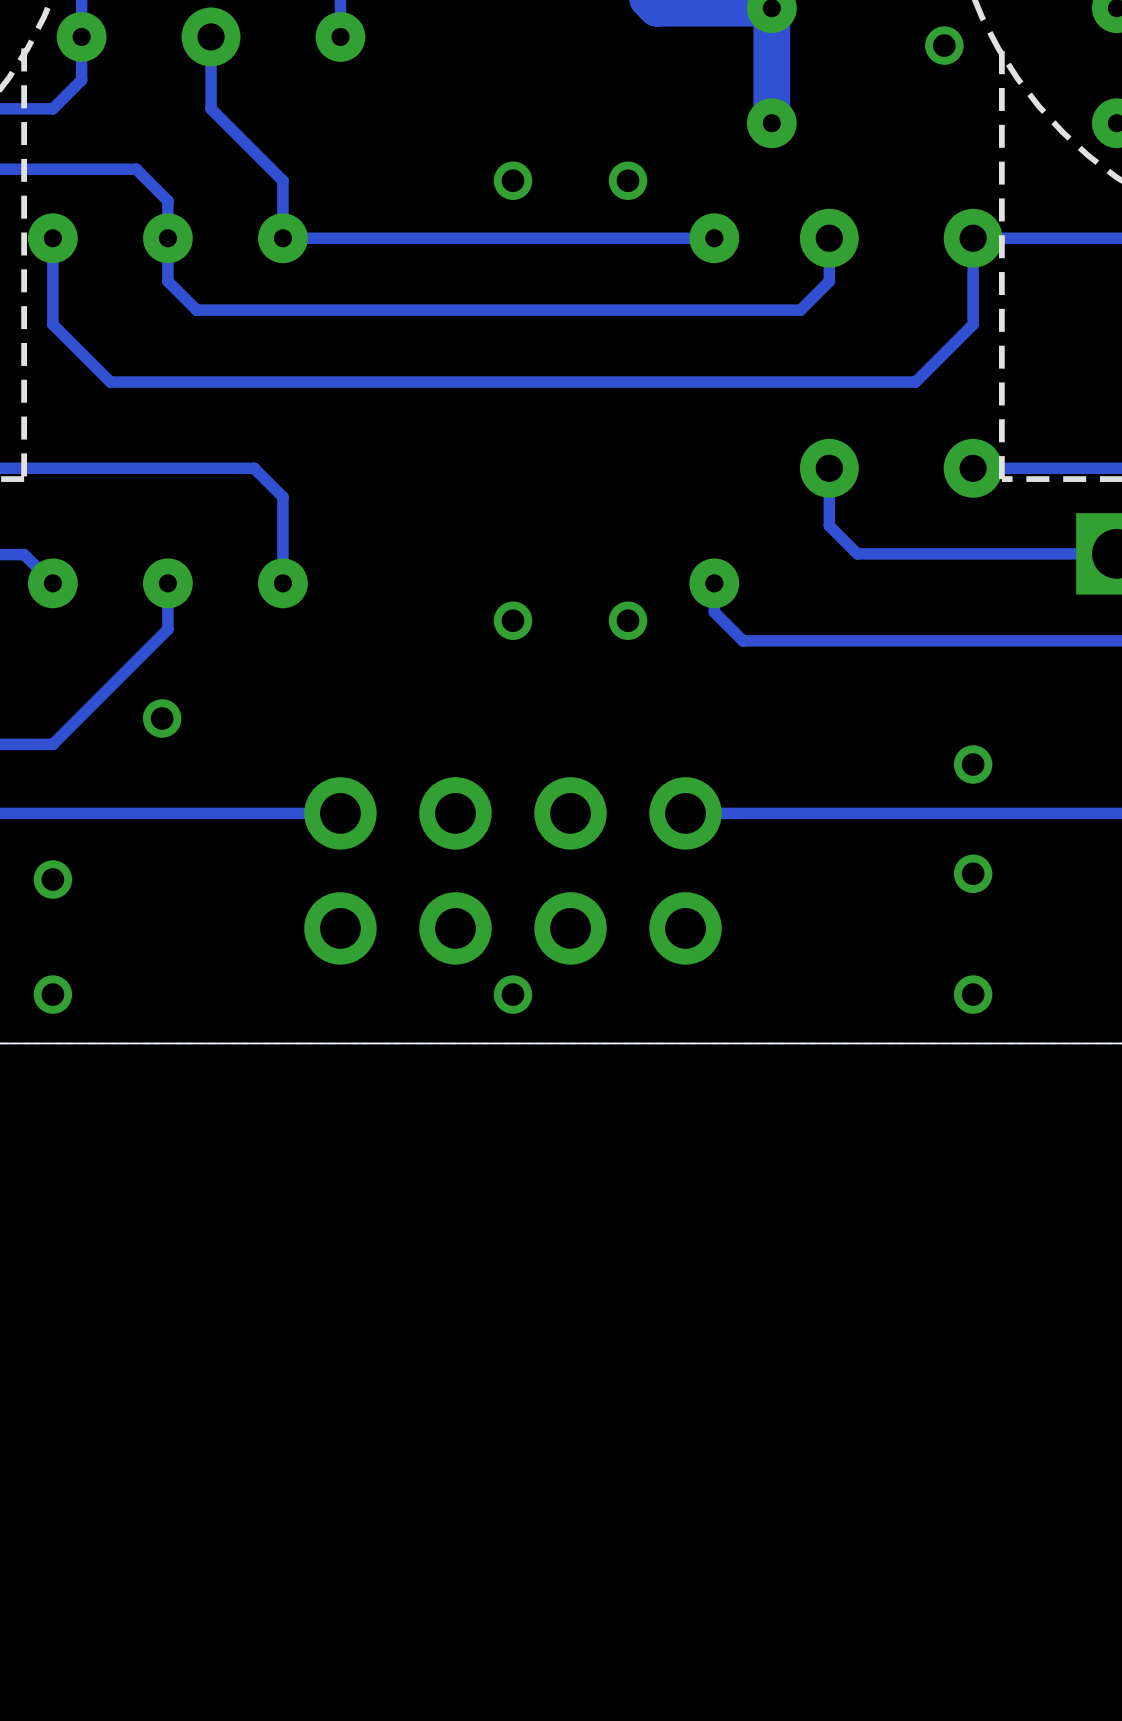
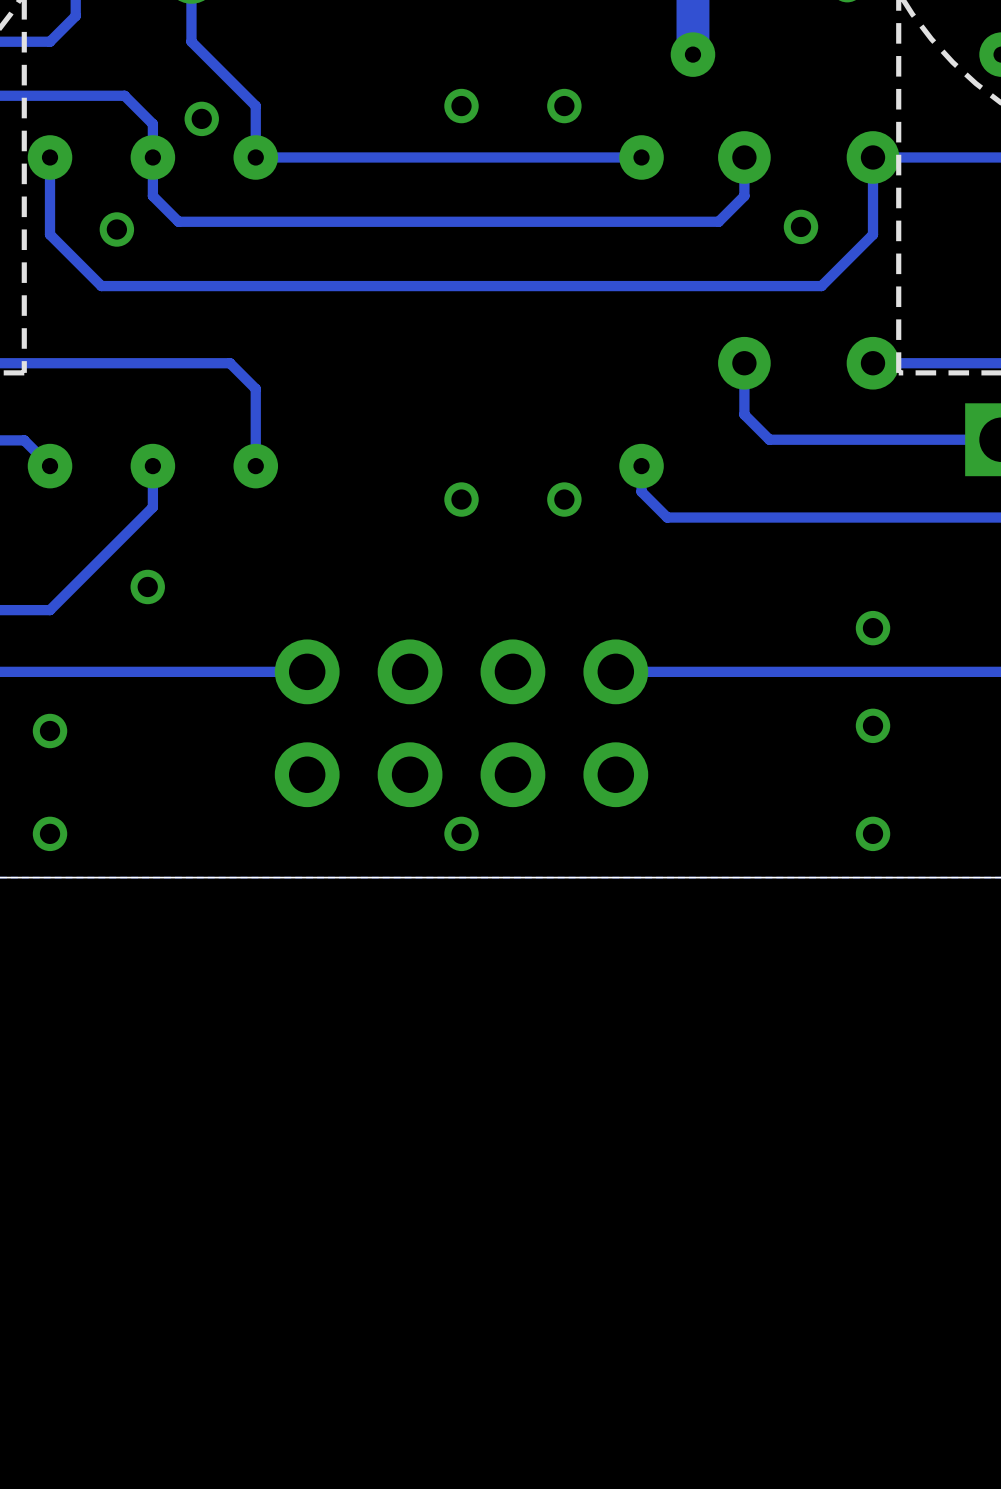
via: none -> (201, 118)
via: none -> (800, 226)
via: none -> (116, 229)

